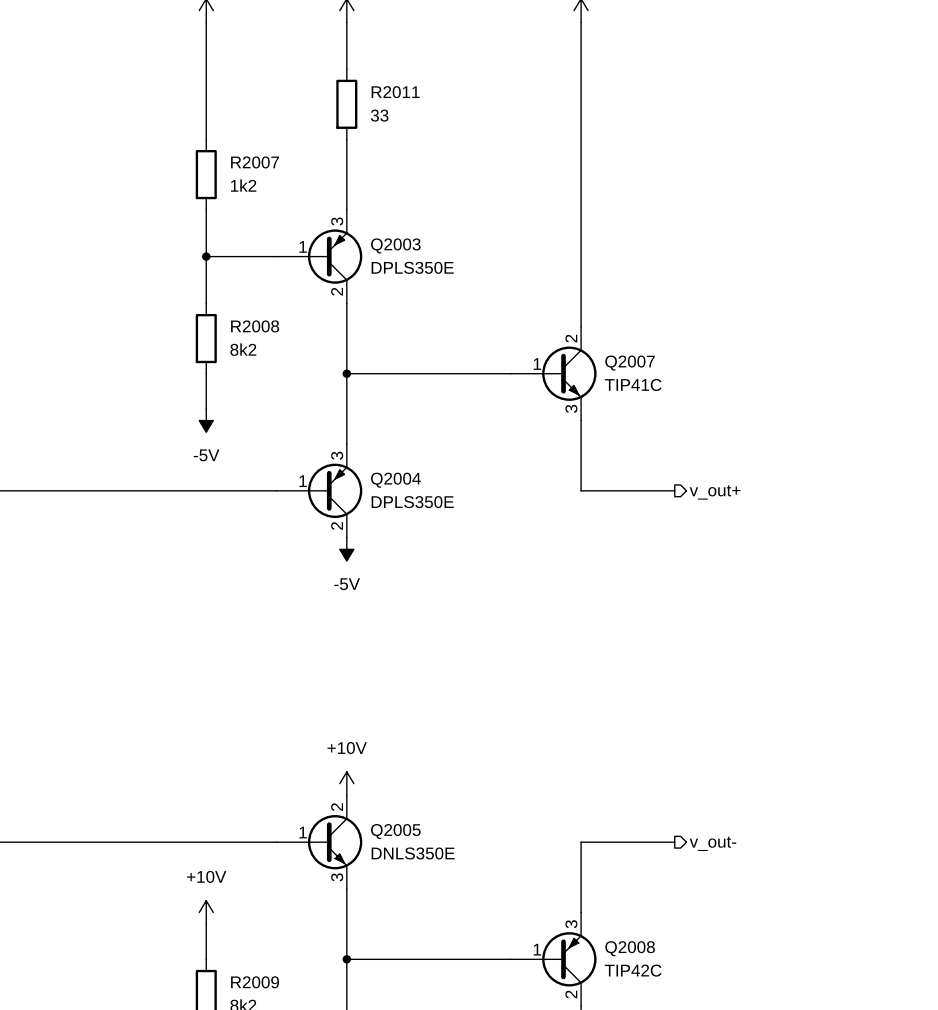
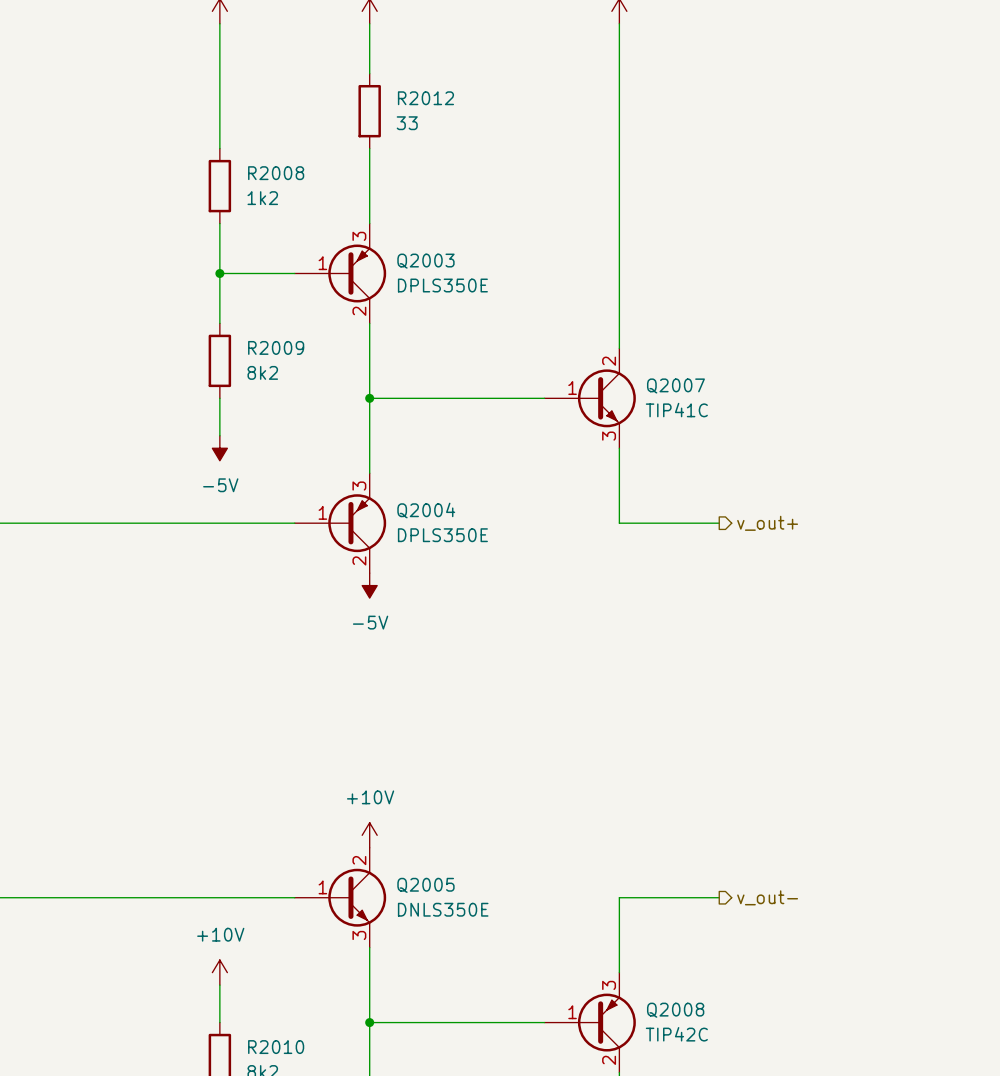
R2011 name: R2011 (395, 92) -> R2012 (425, 98)
R2007 name: R2007 (255, 162) -> R2008 (276, 173)
R2008 name: R2008 (255, 326) -> R2009 (276, 347)
R2009 name: R2009 (255, 982) -> R2010 (276, 1047)

